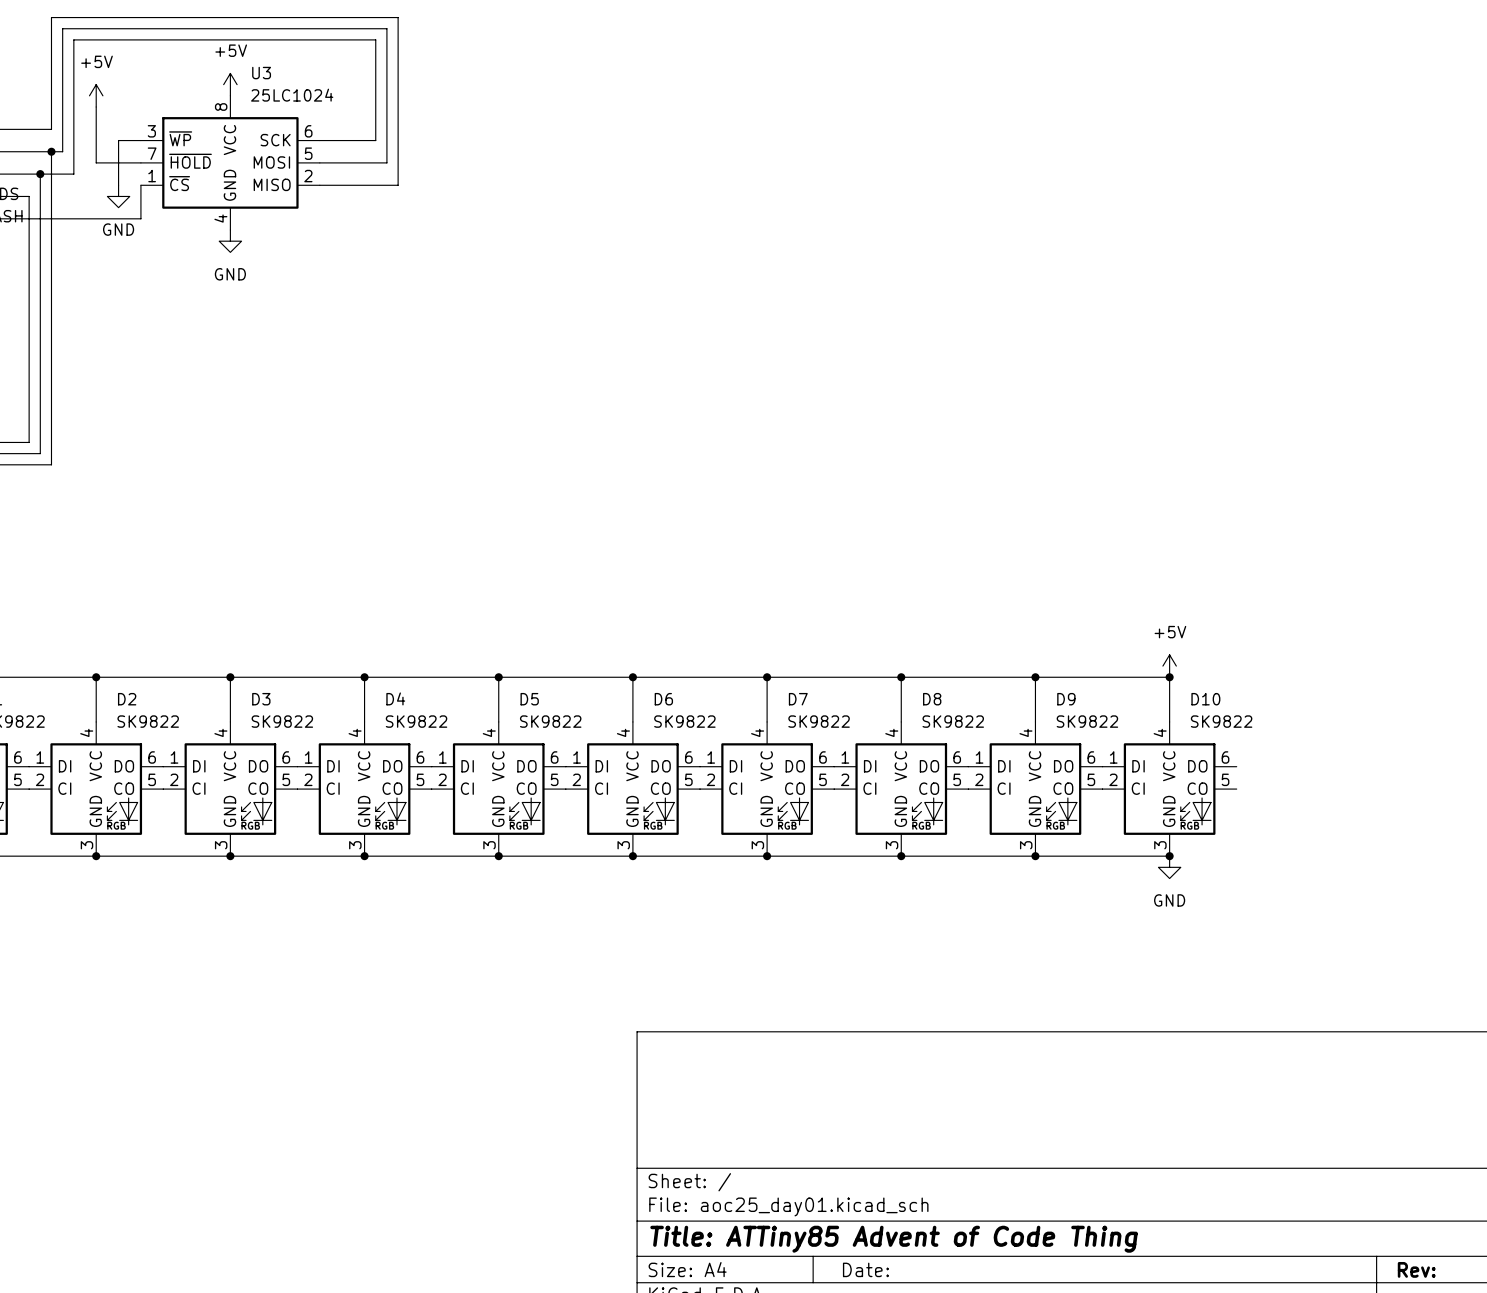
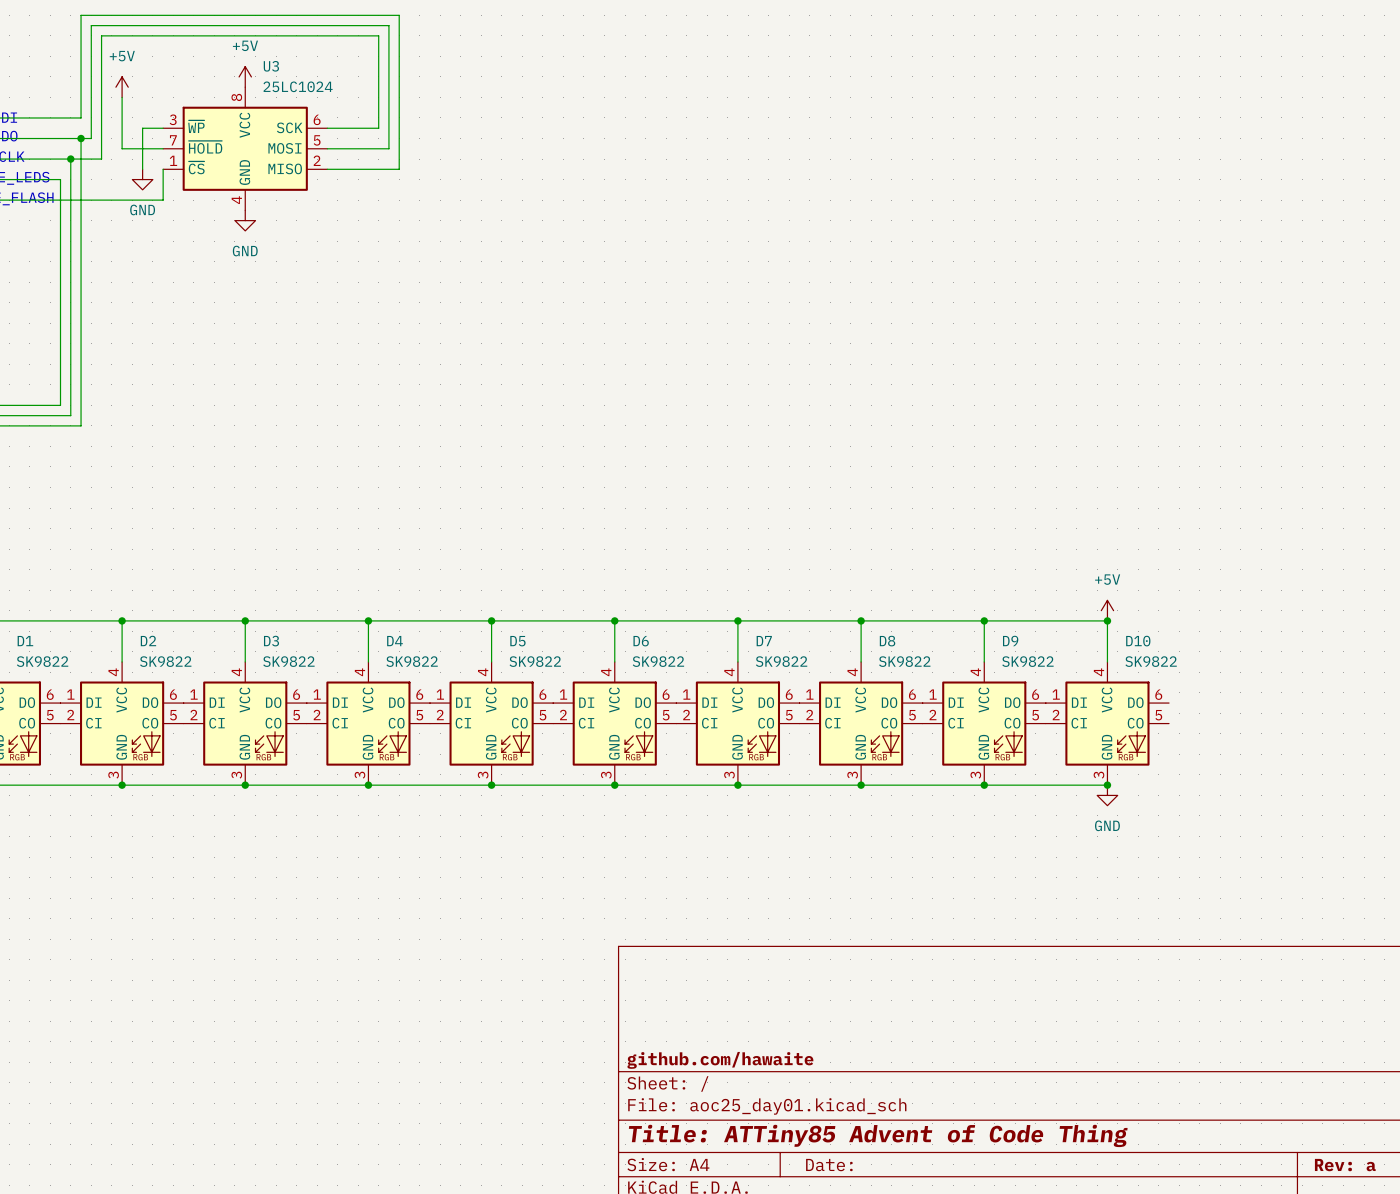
title block: none -> github.com/hawaite (720, 1060)
title block: Rev: (1416, 1269) -> Rev: a (1345, 1165)

